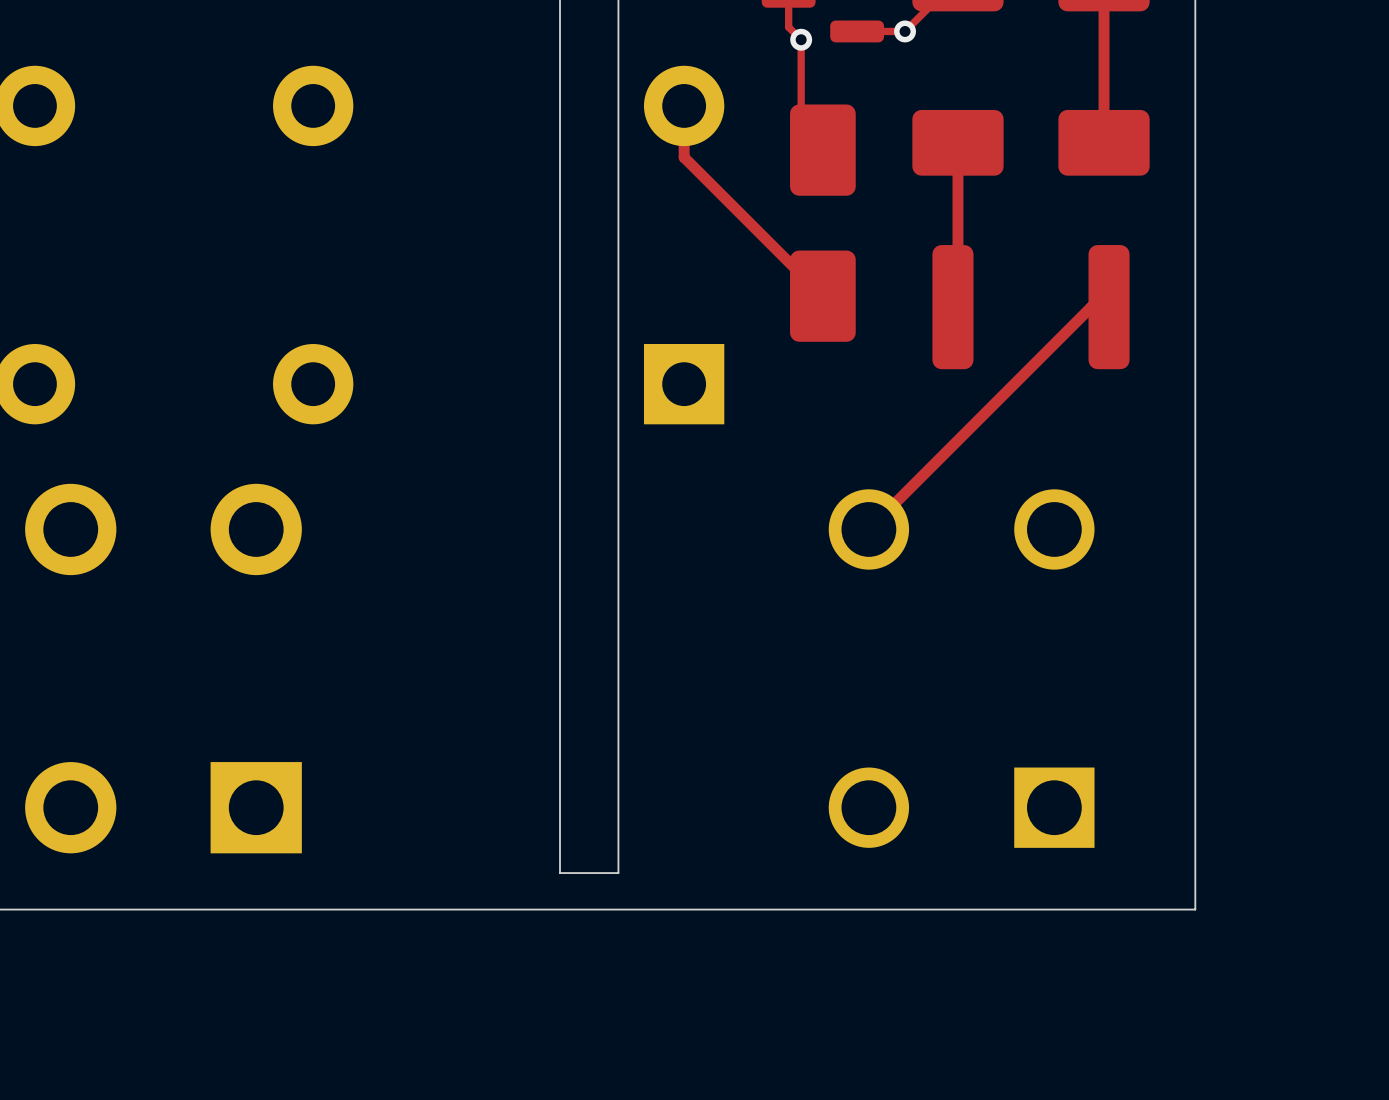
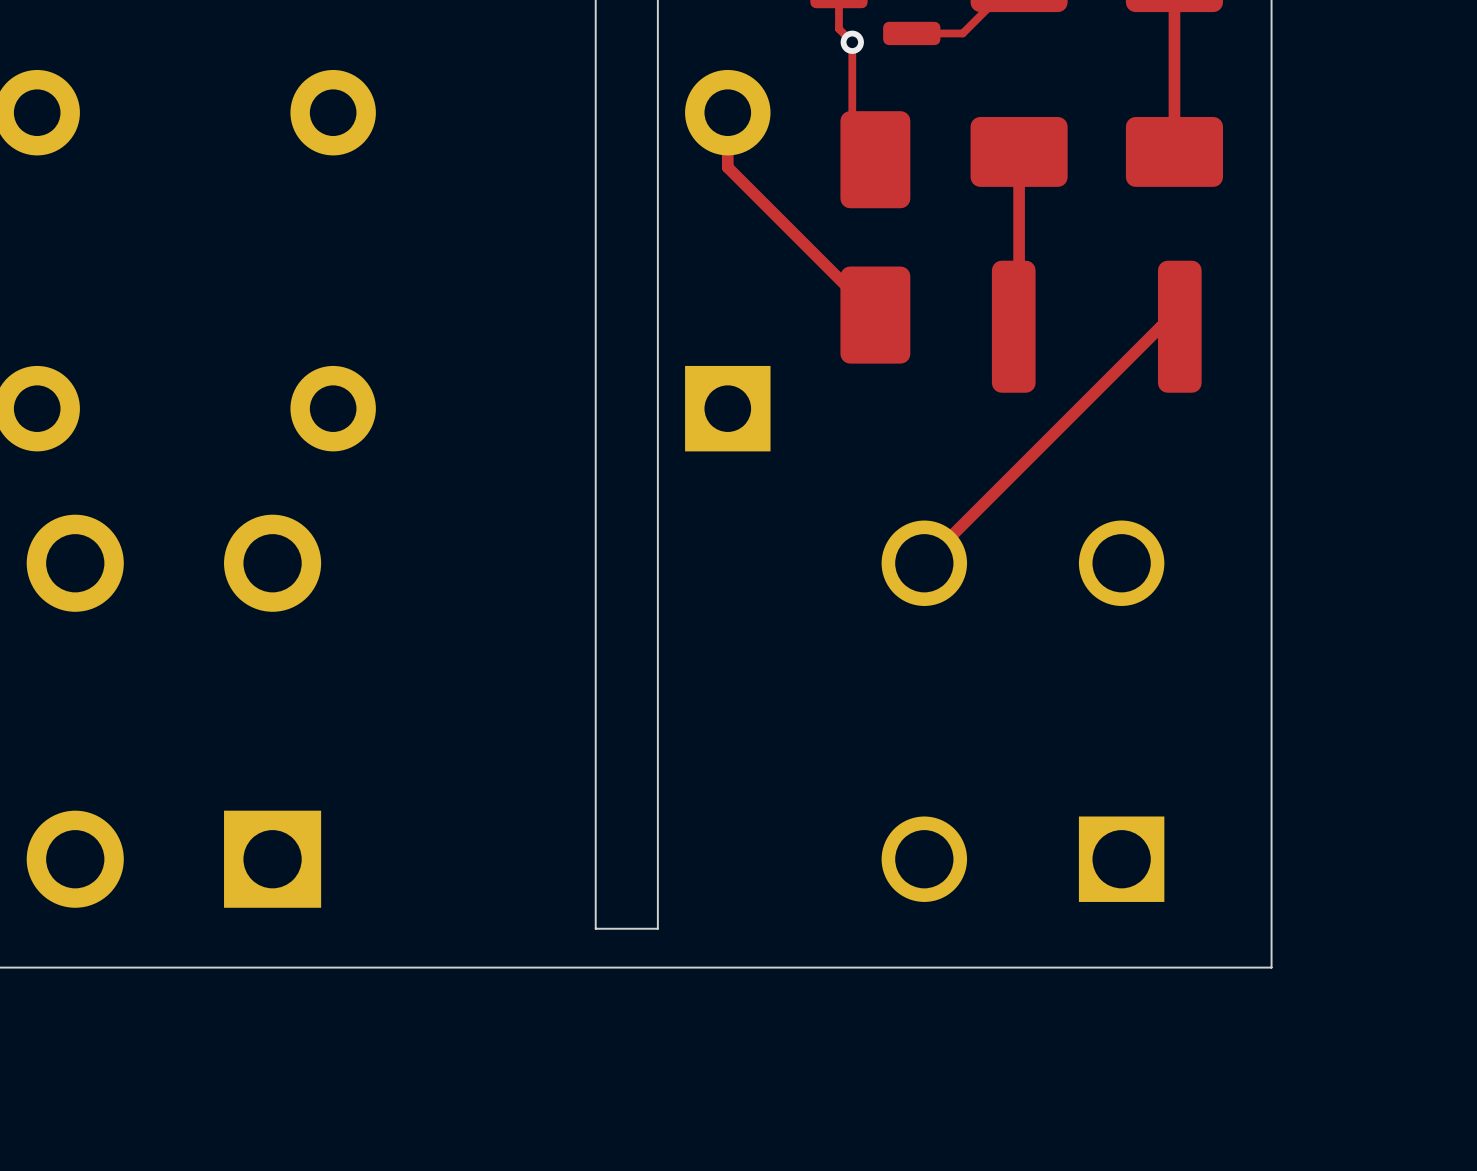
via: (905, 31) -> none

